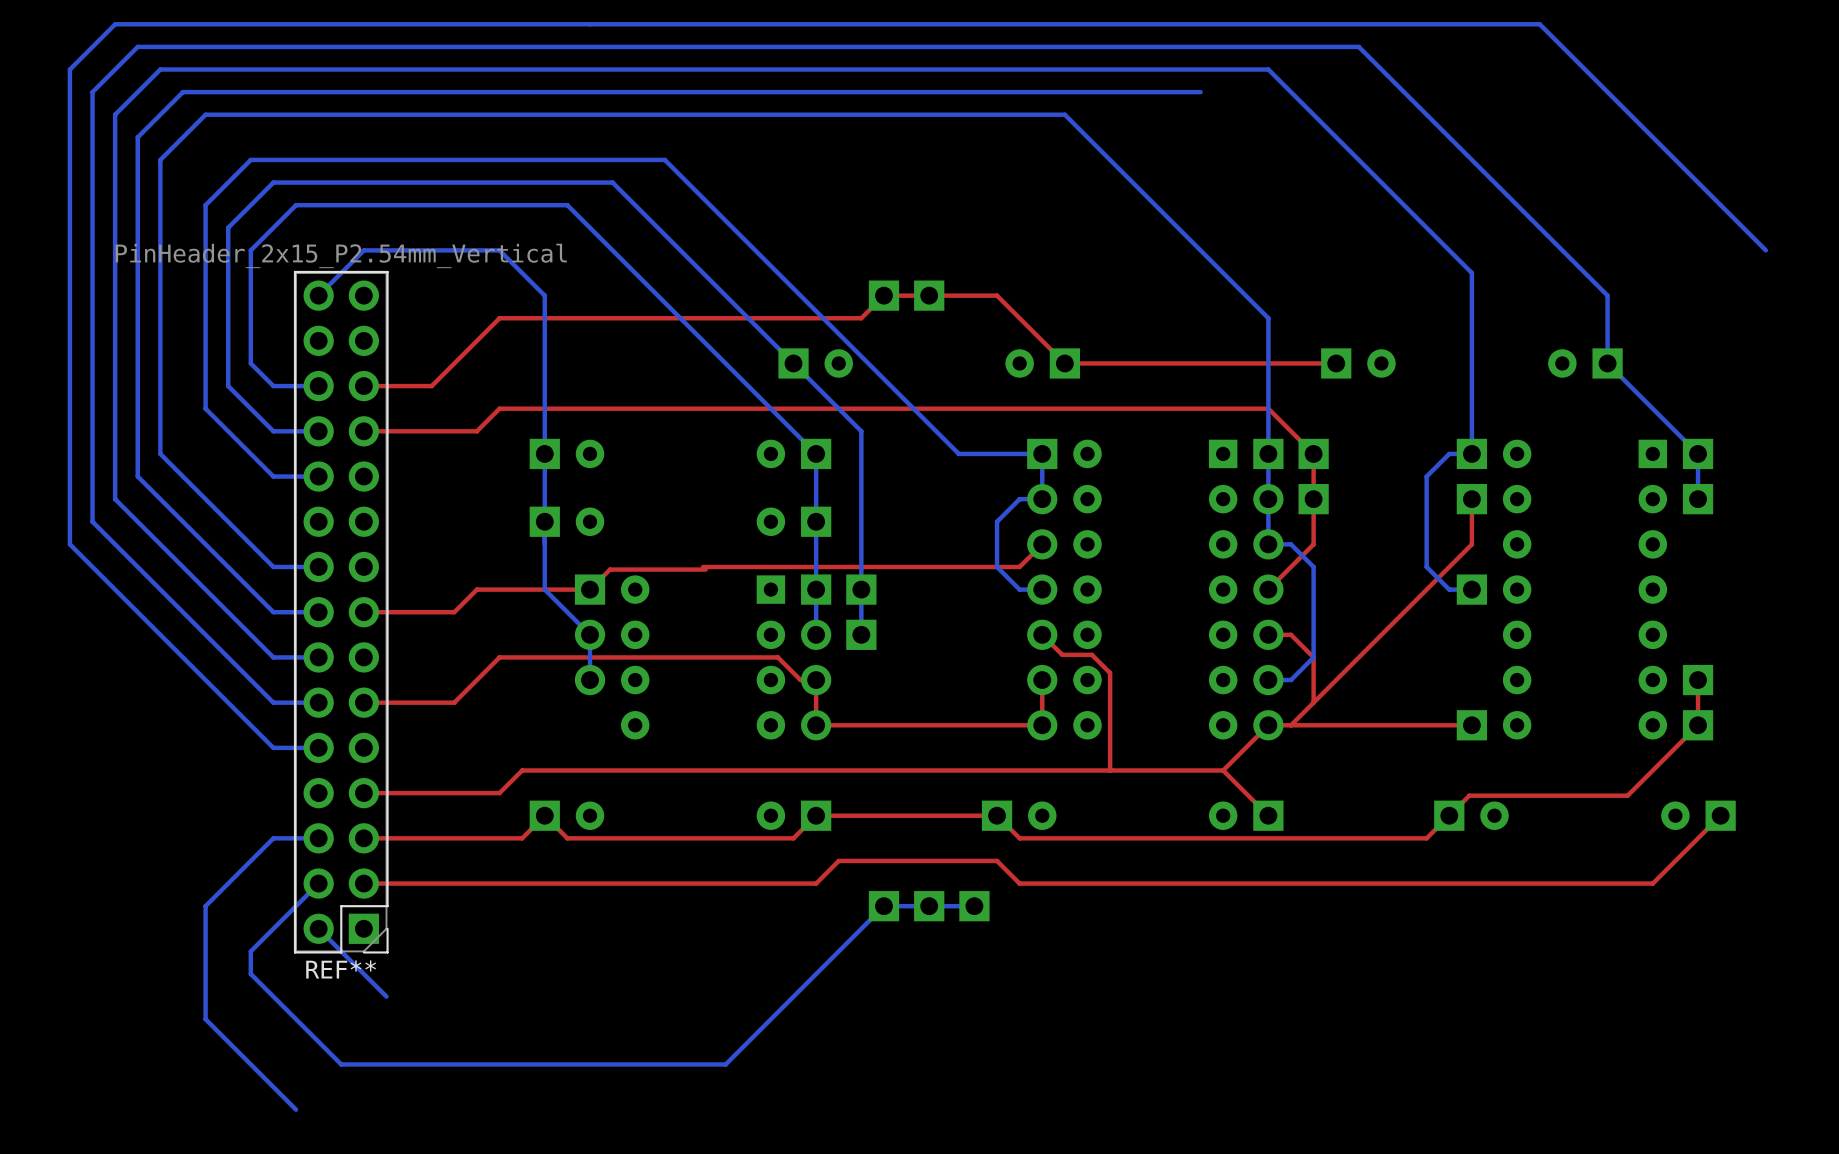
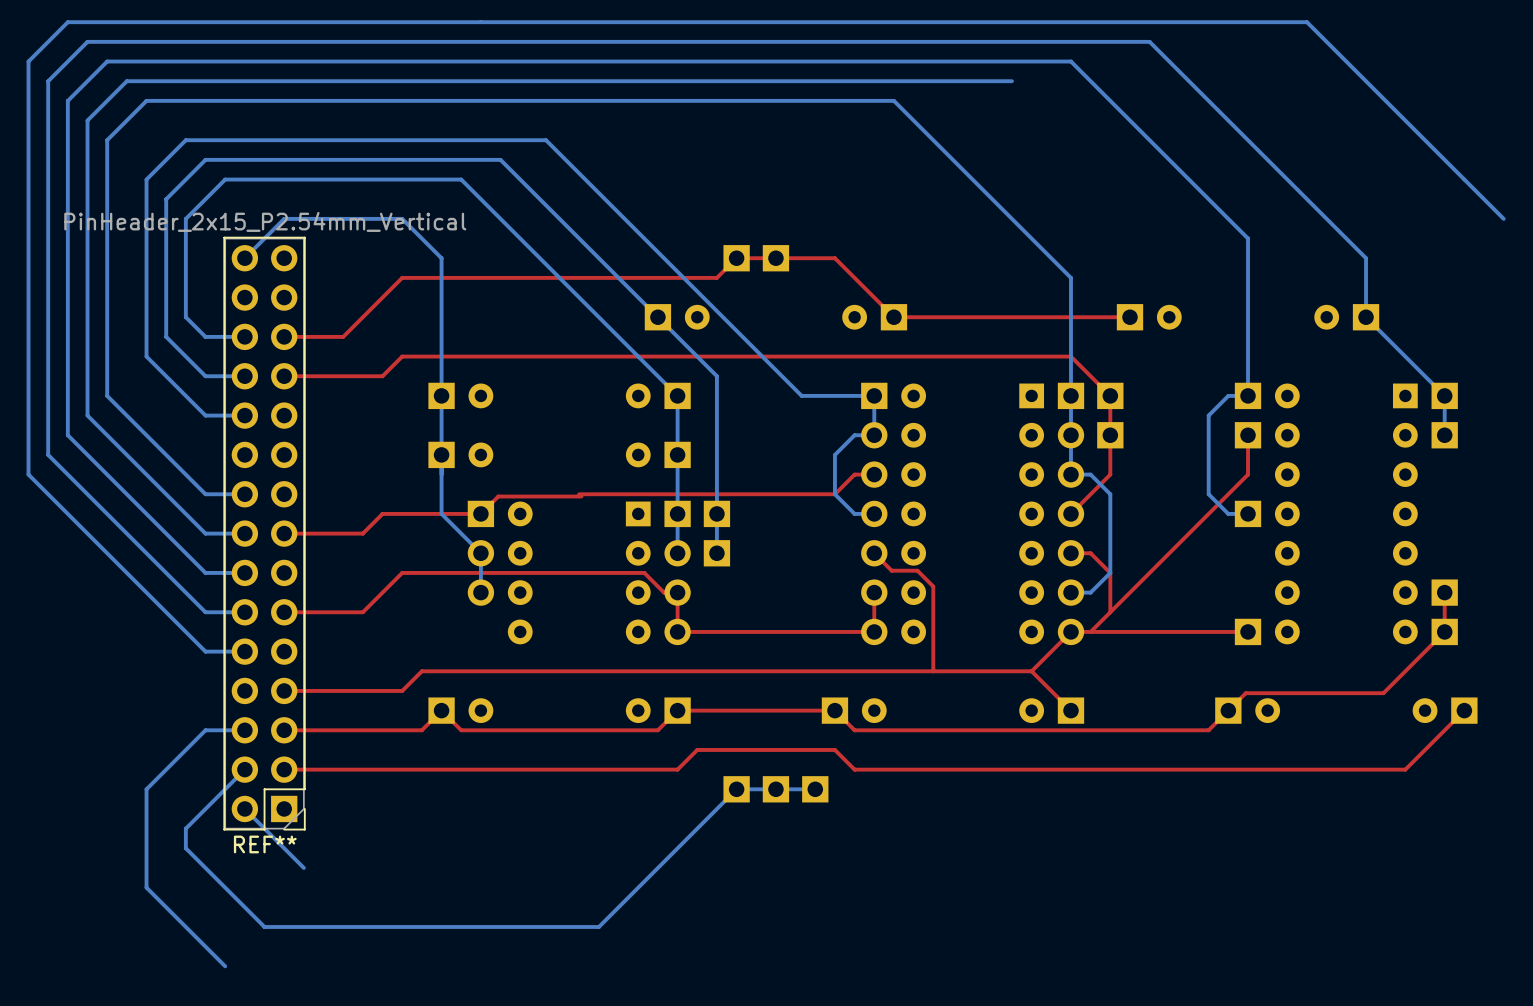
top track: (1042, 544) (1019, 566) (997, 566) -> (874, 474) (854, 474) (834, 494)

